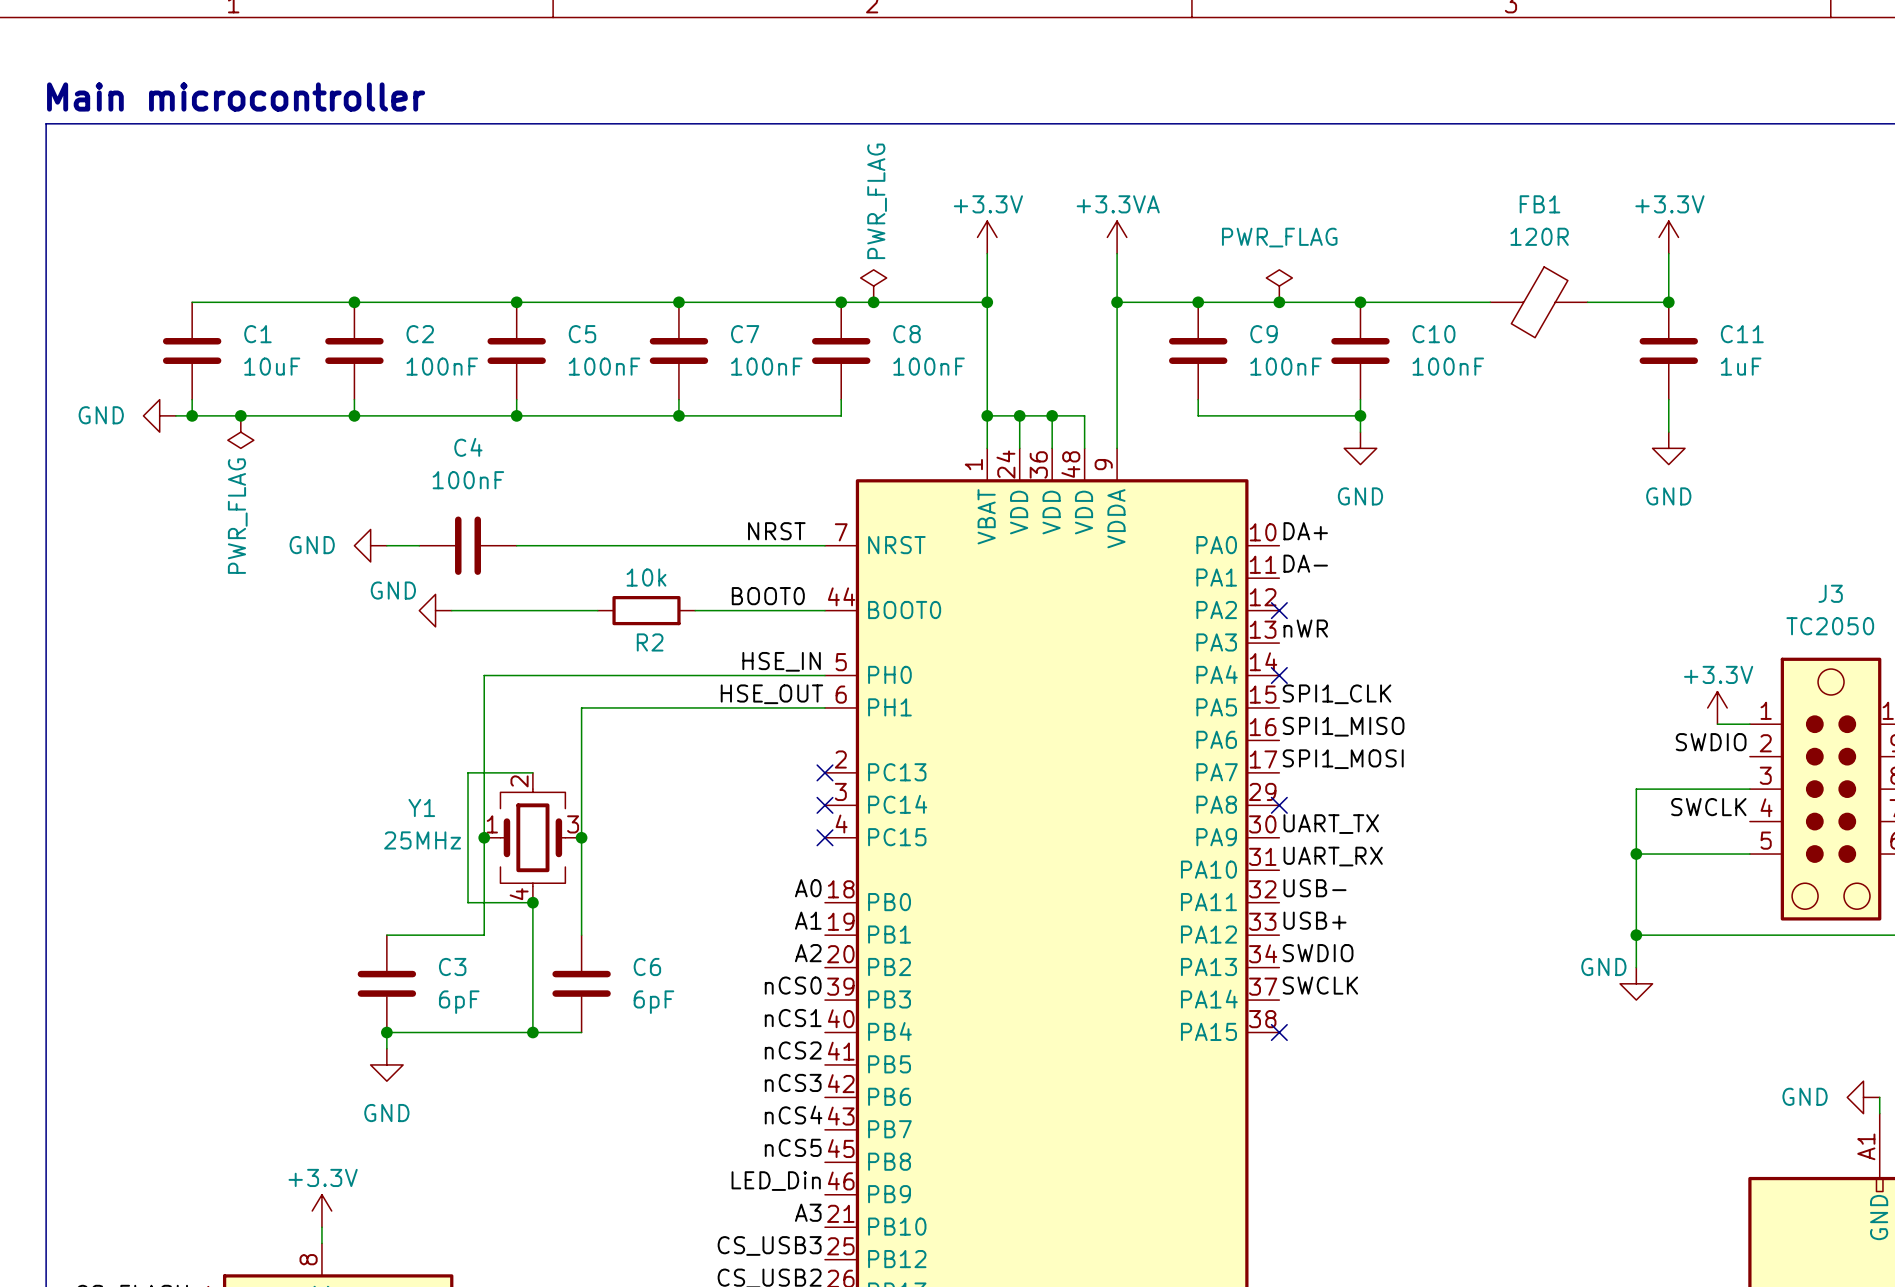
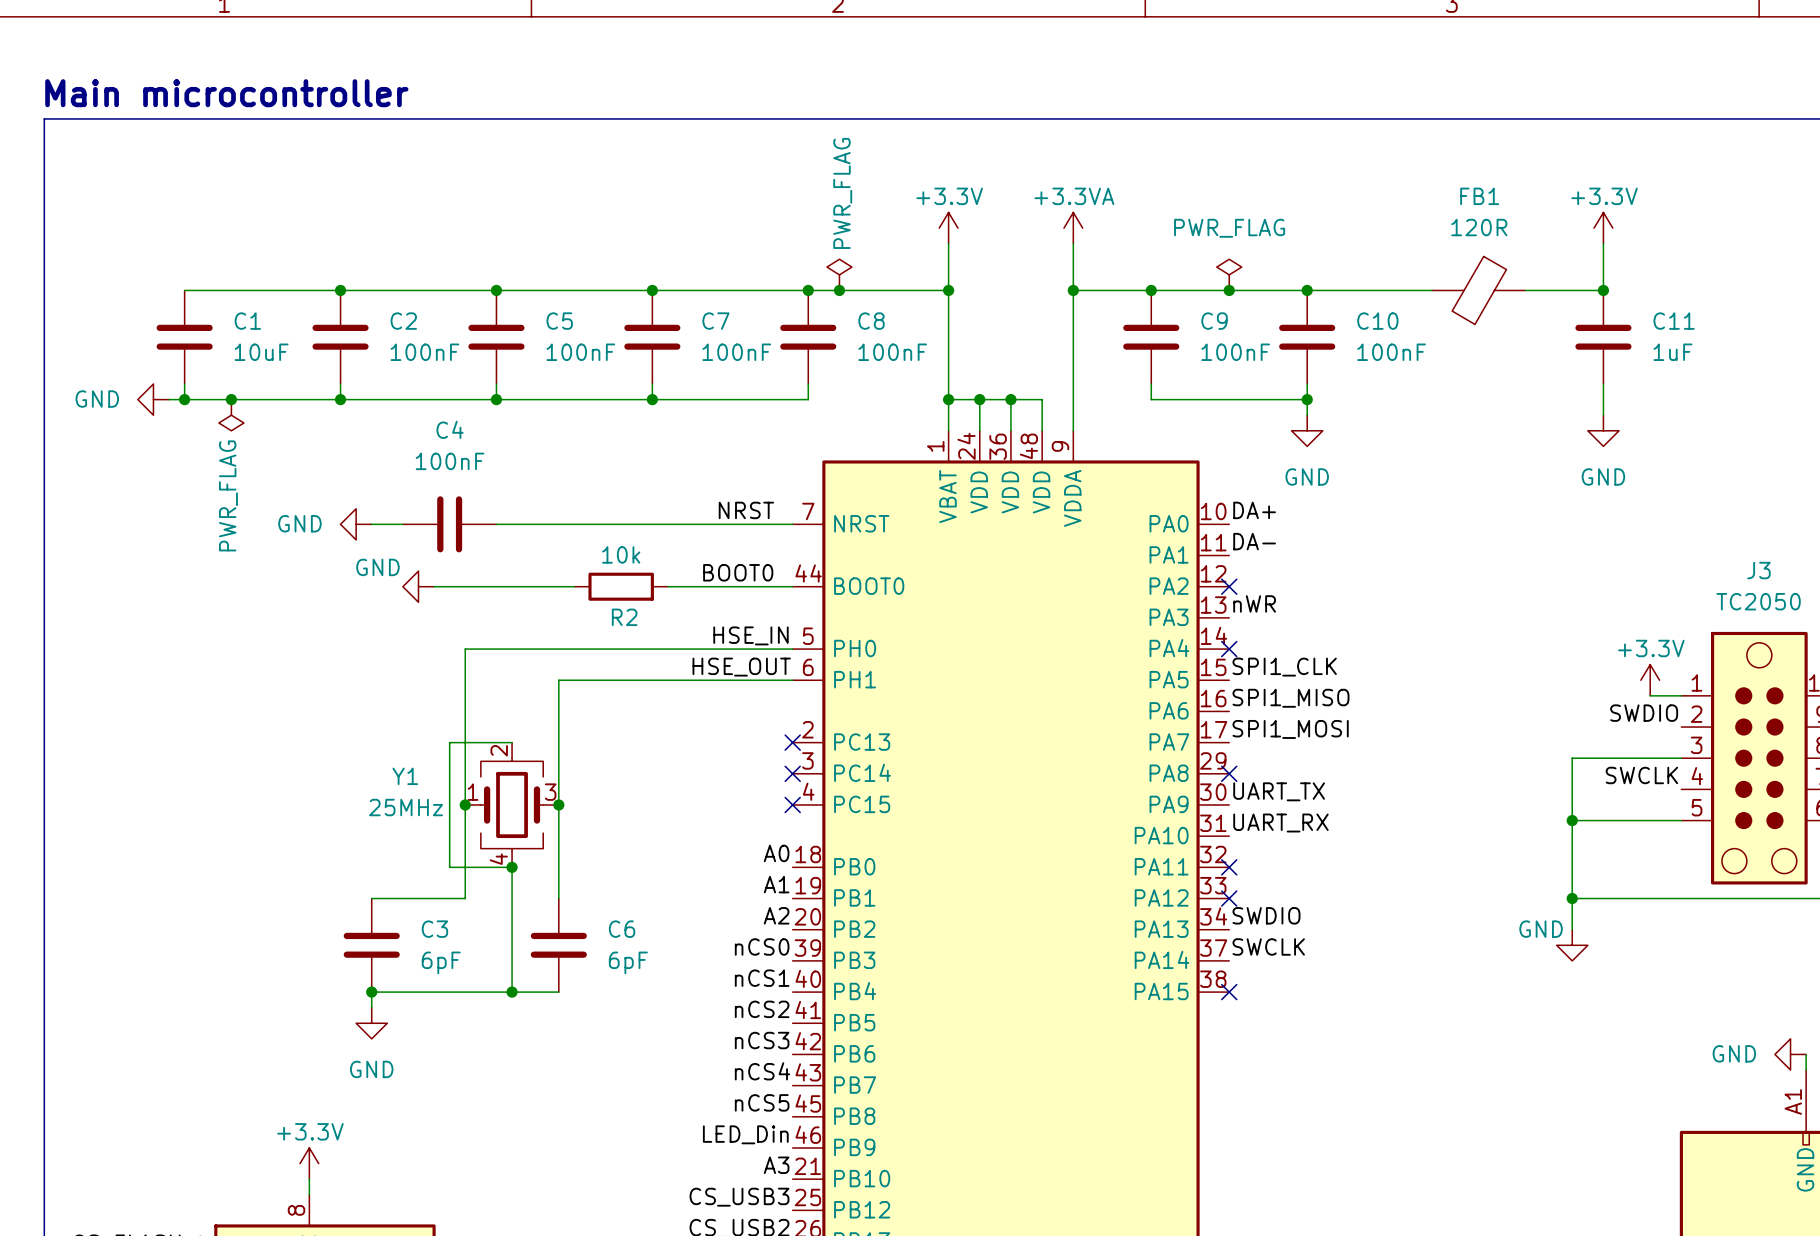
label: USB- (1315, 888) -> none
no-connect mark: none -> (1229, 867)
label: USB+ (1315, 920) -> none
no-connect mark: none -> (1229, 898)

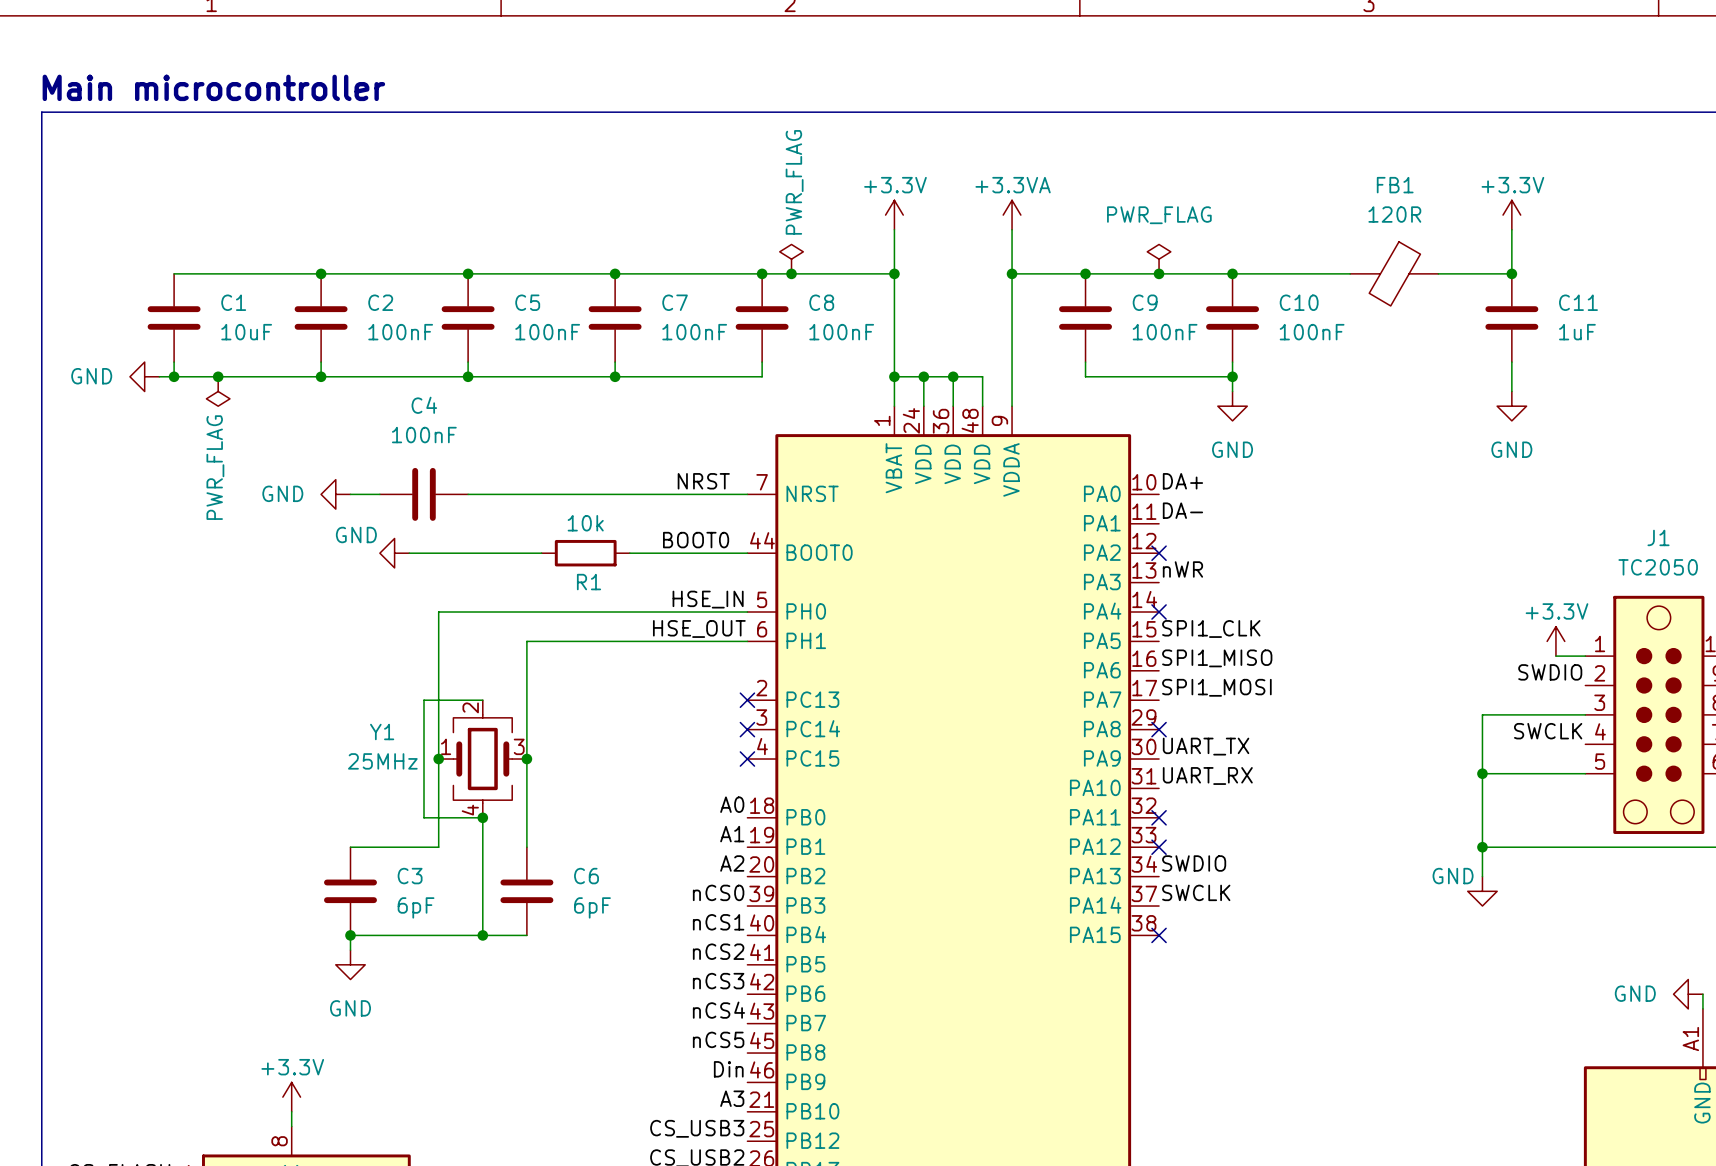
J3 name: J3 (1758, 570) -> J1 (1658, 537)
R2 name: R2 (624, 617) -> R1 (588, 582)
label: LED_Din (745, 1134) -> Din (728, 1069)

